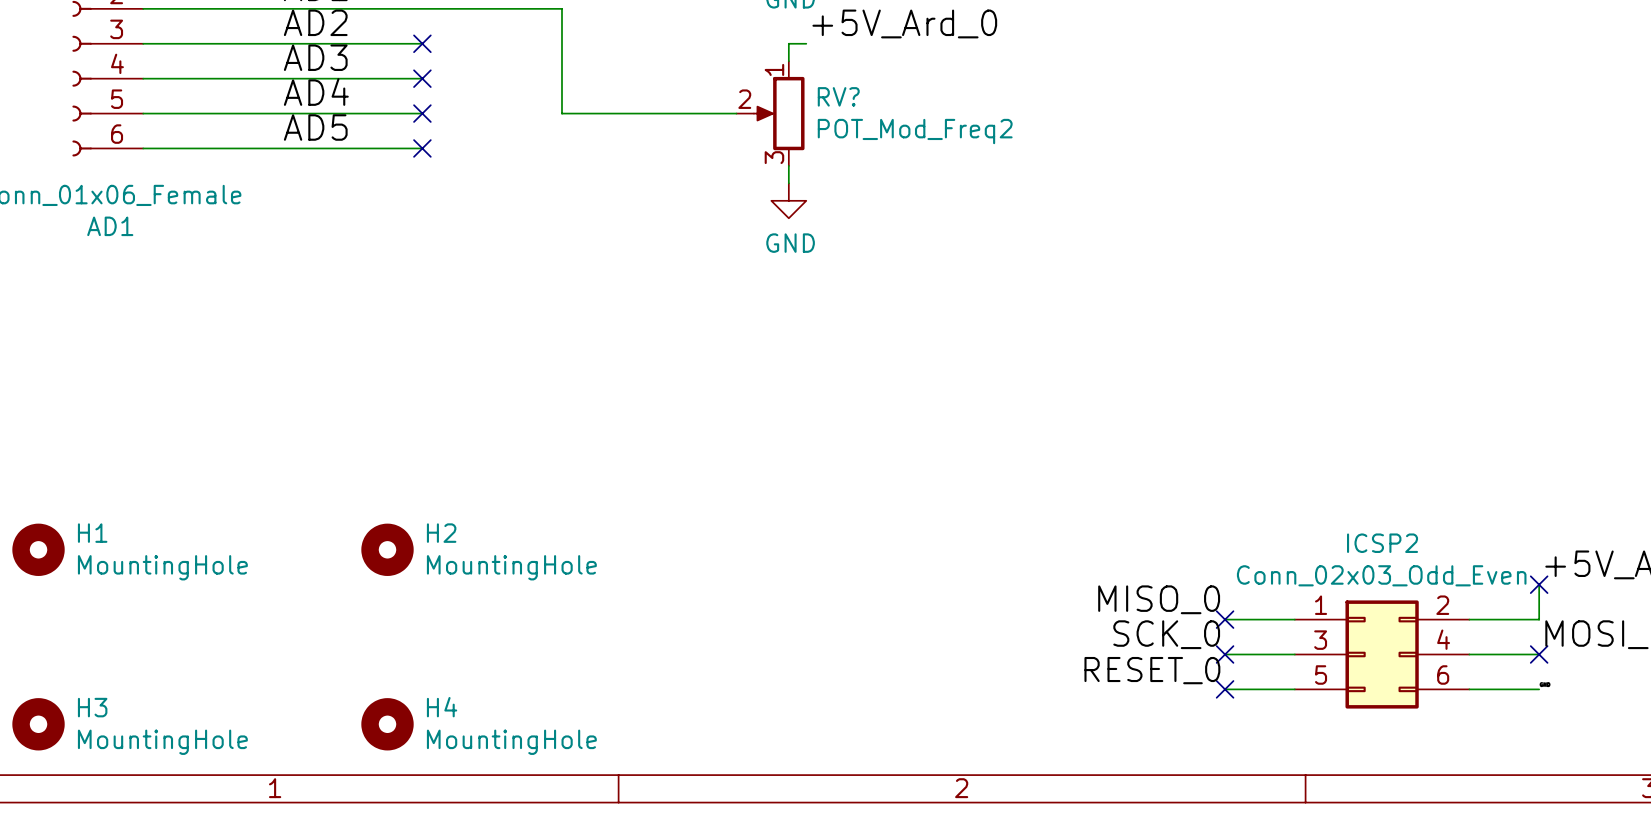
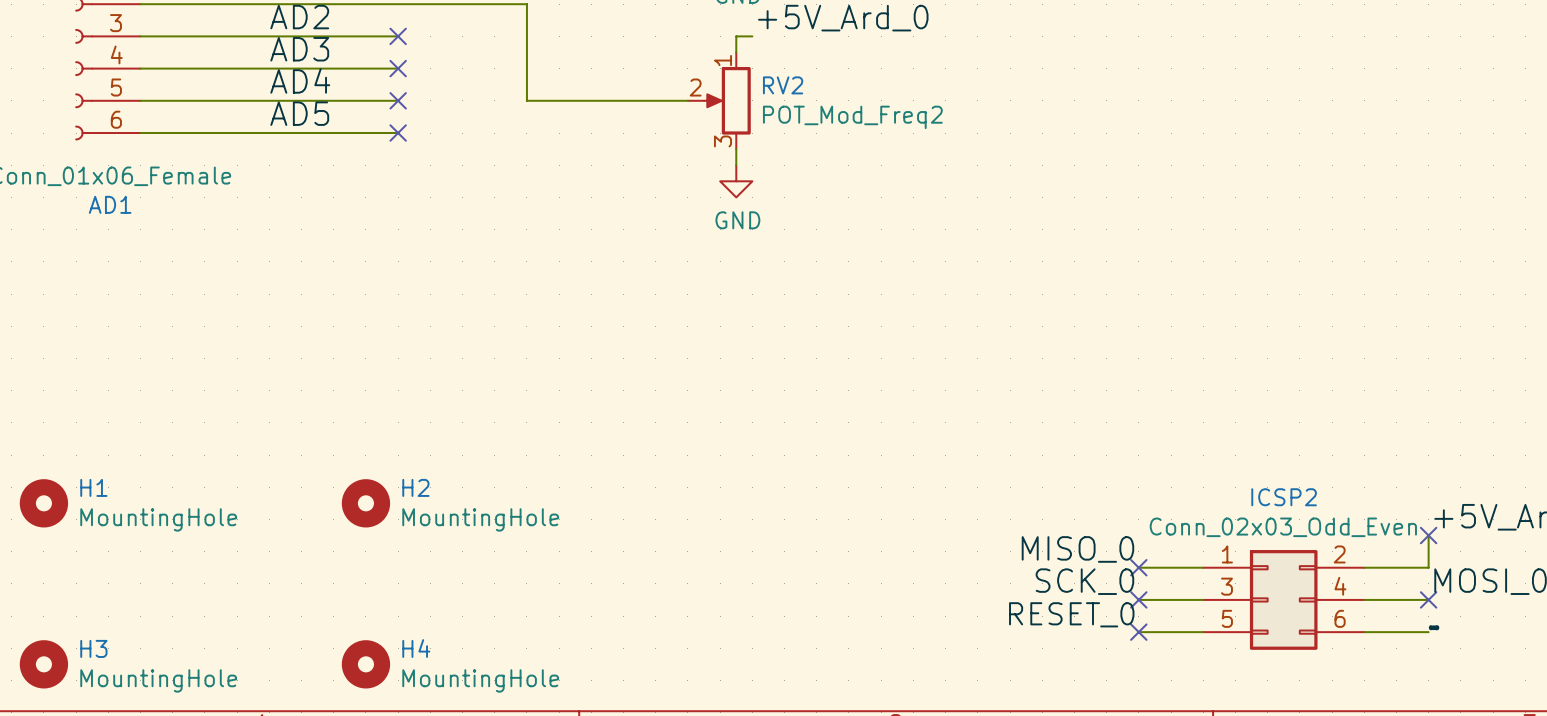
RV? name: RV? (838, 96) -> RV2 (783, 85)

